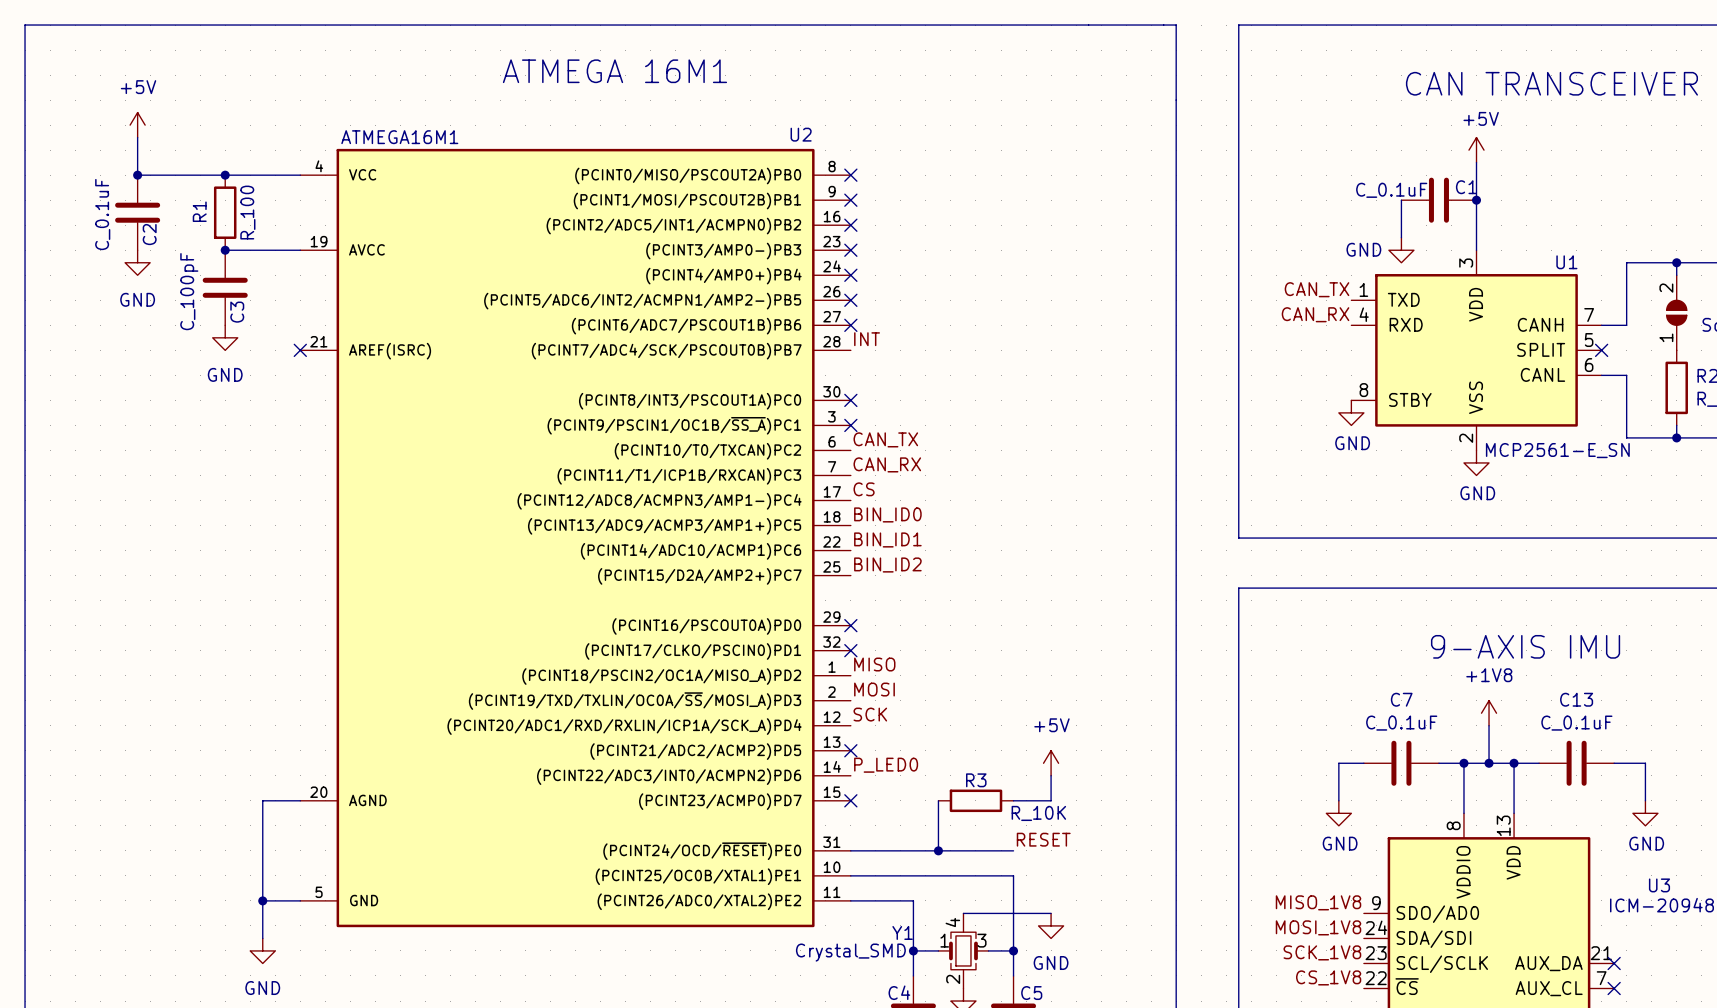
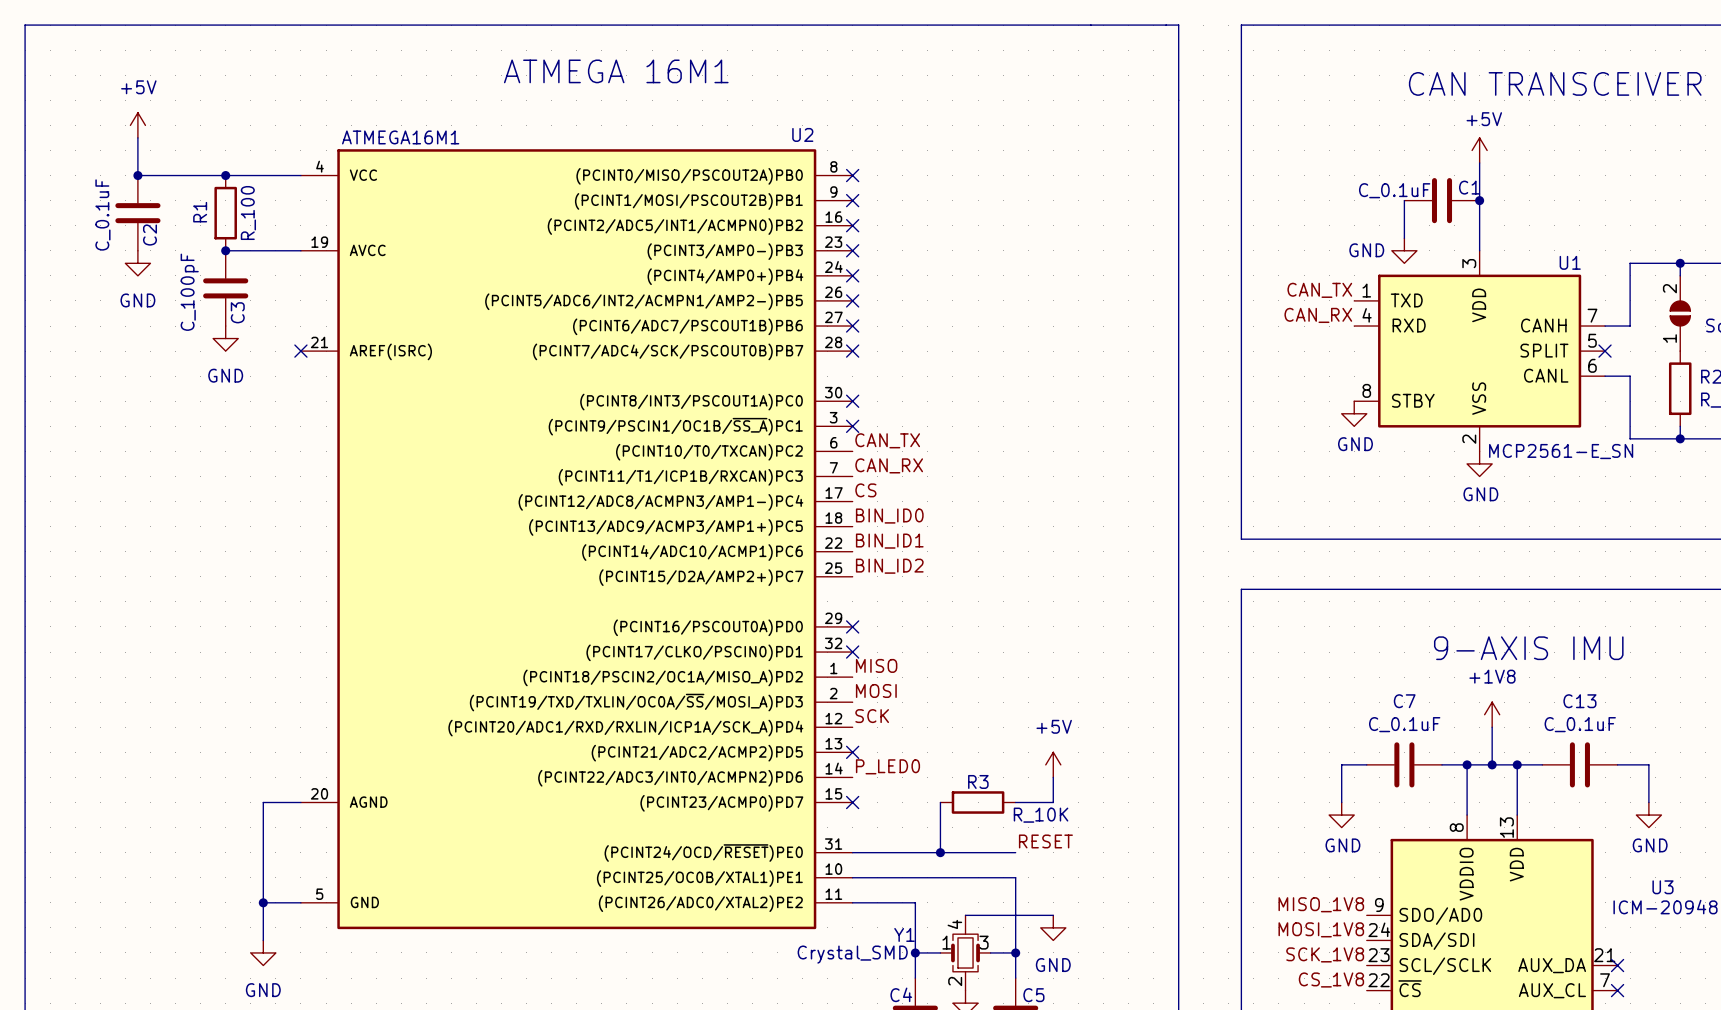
label: INT (867, 339) -> none
no-connect mark: none -> (852, 351)

